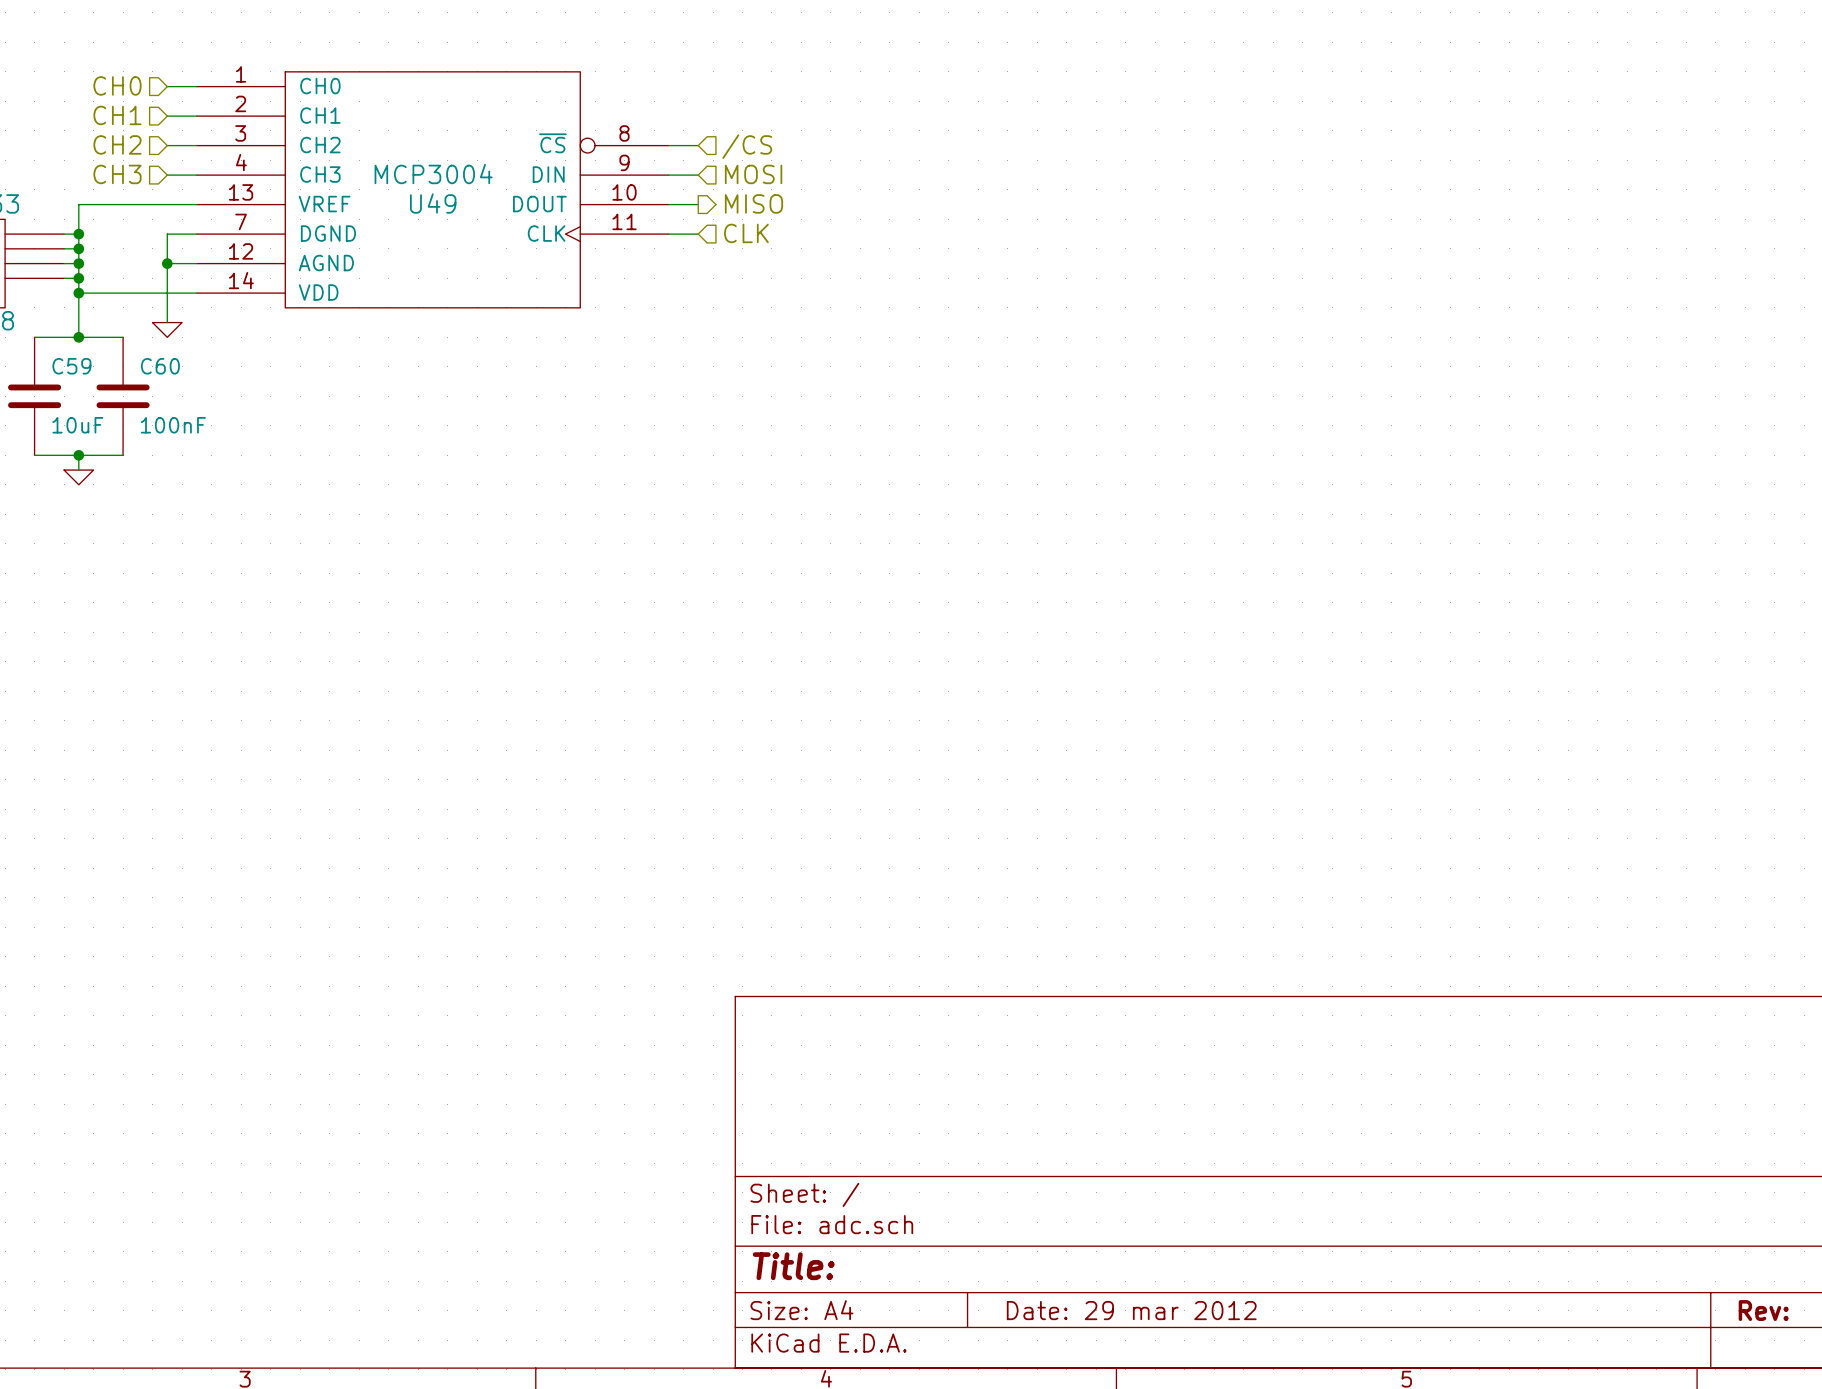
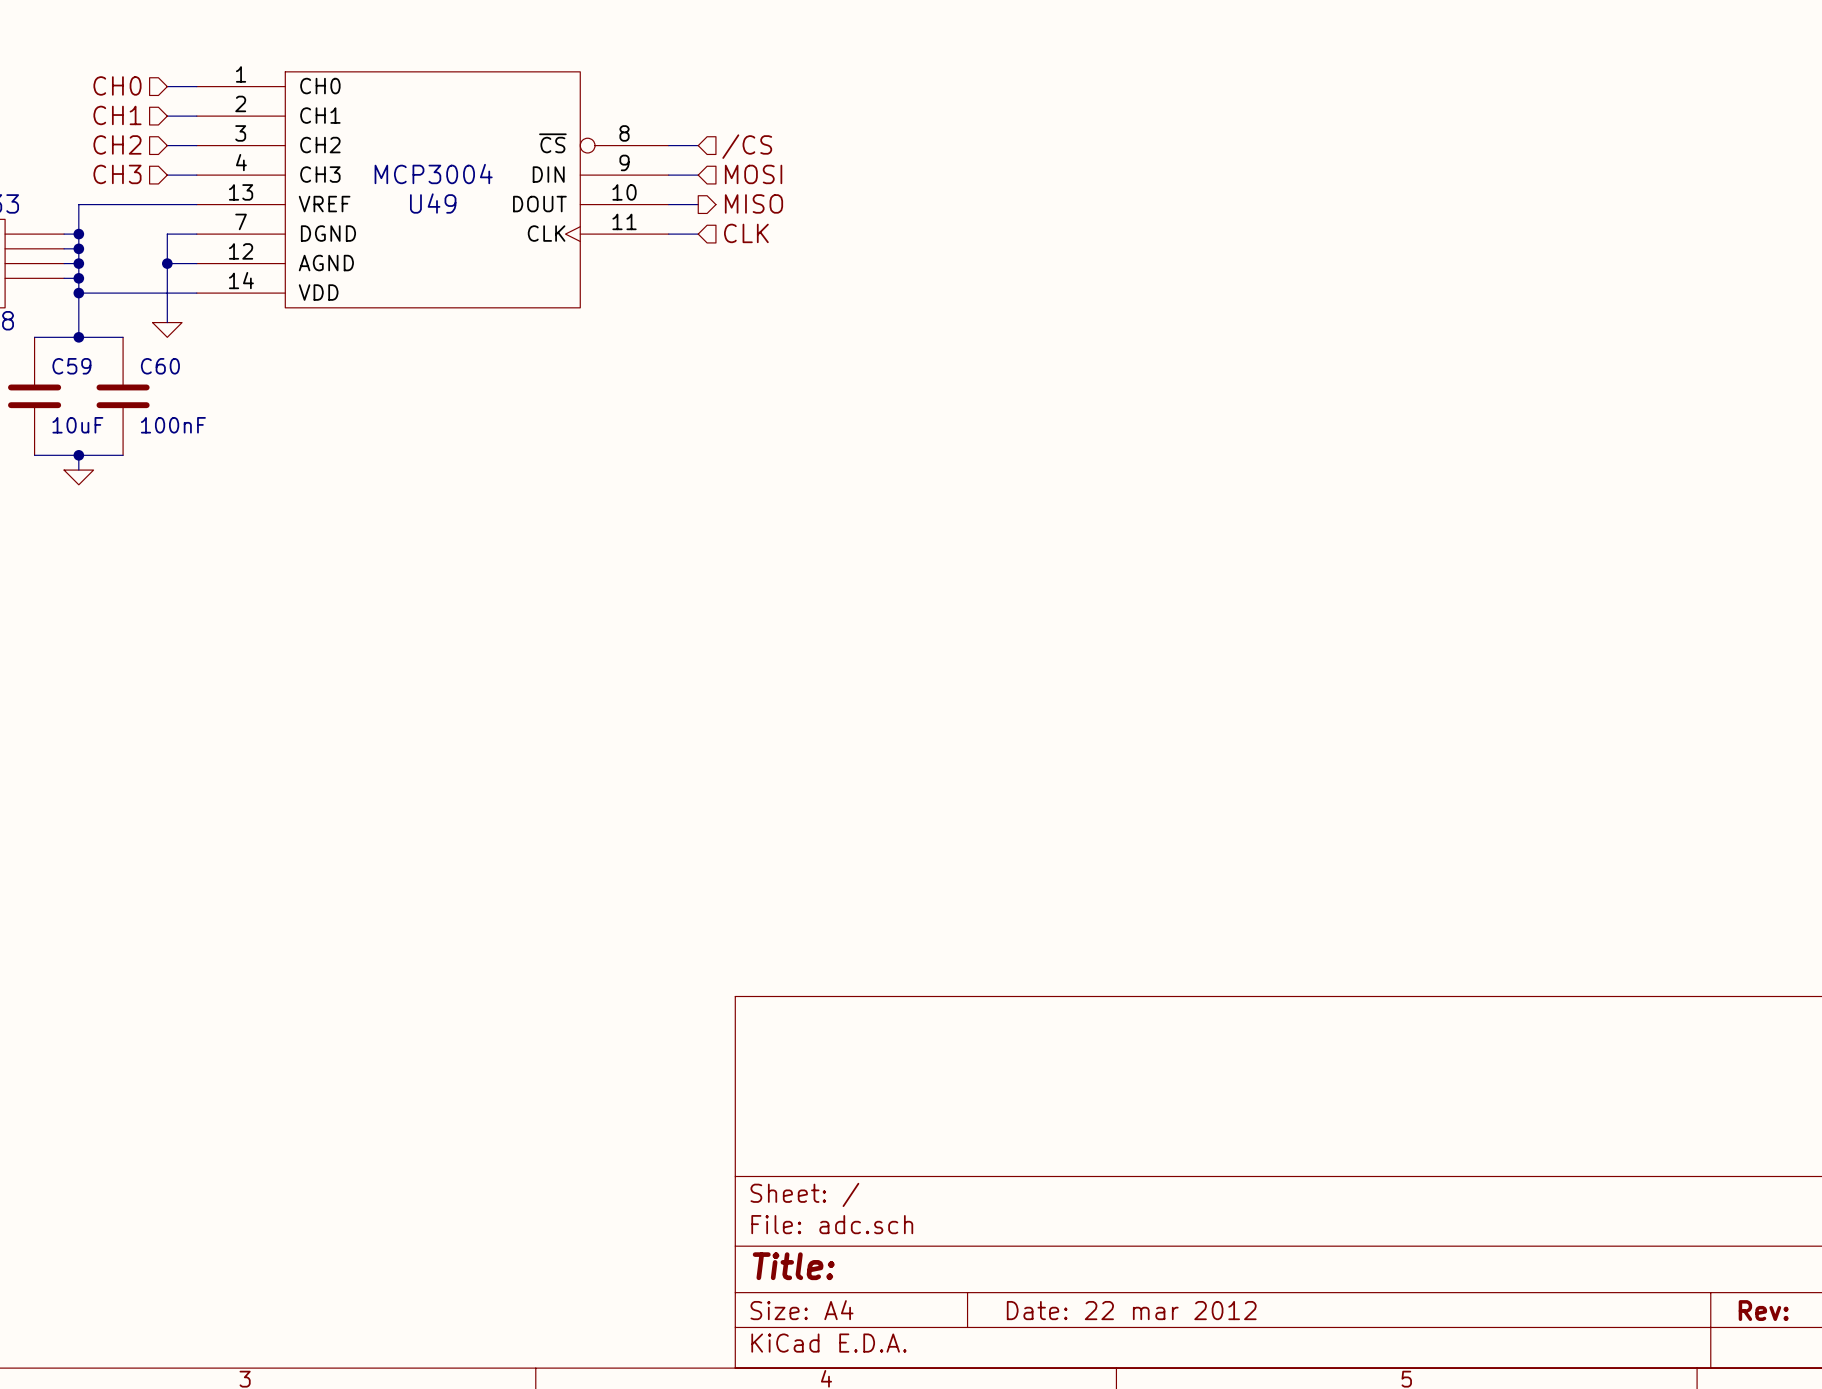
title block: Date: 29 mar 2012 (1131, 1310) -> Date: 22 mar 2012 (1131, 1310)

